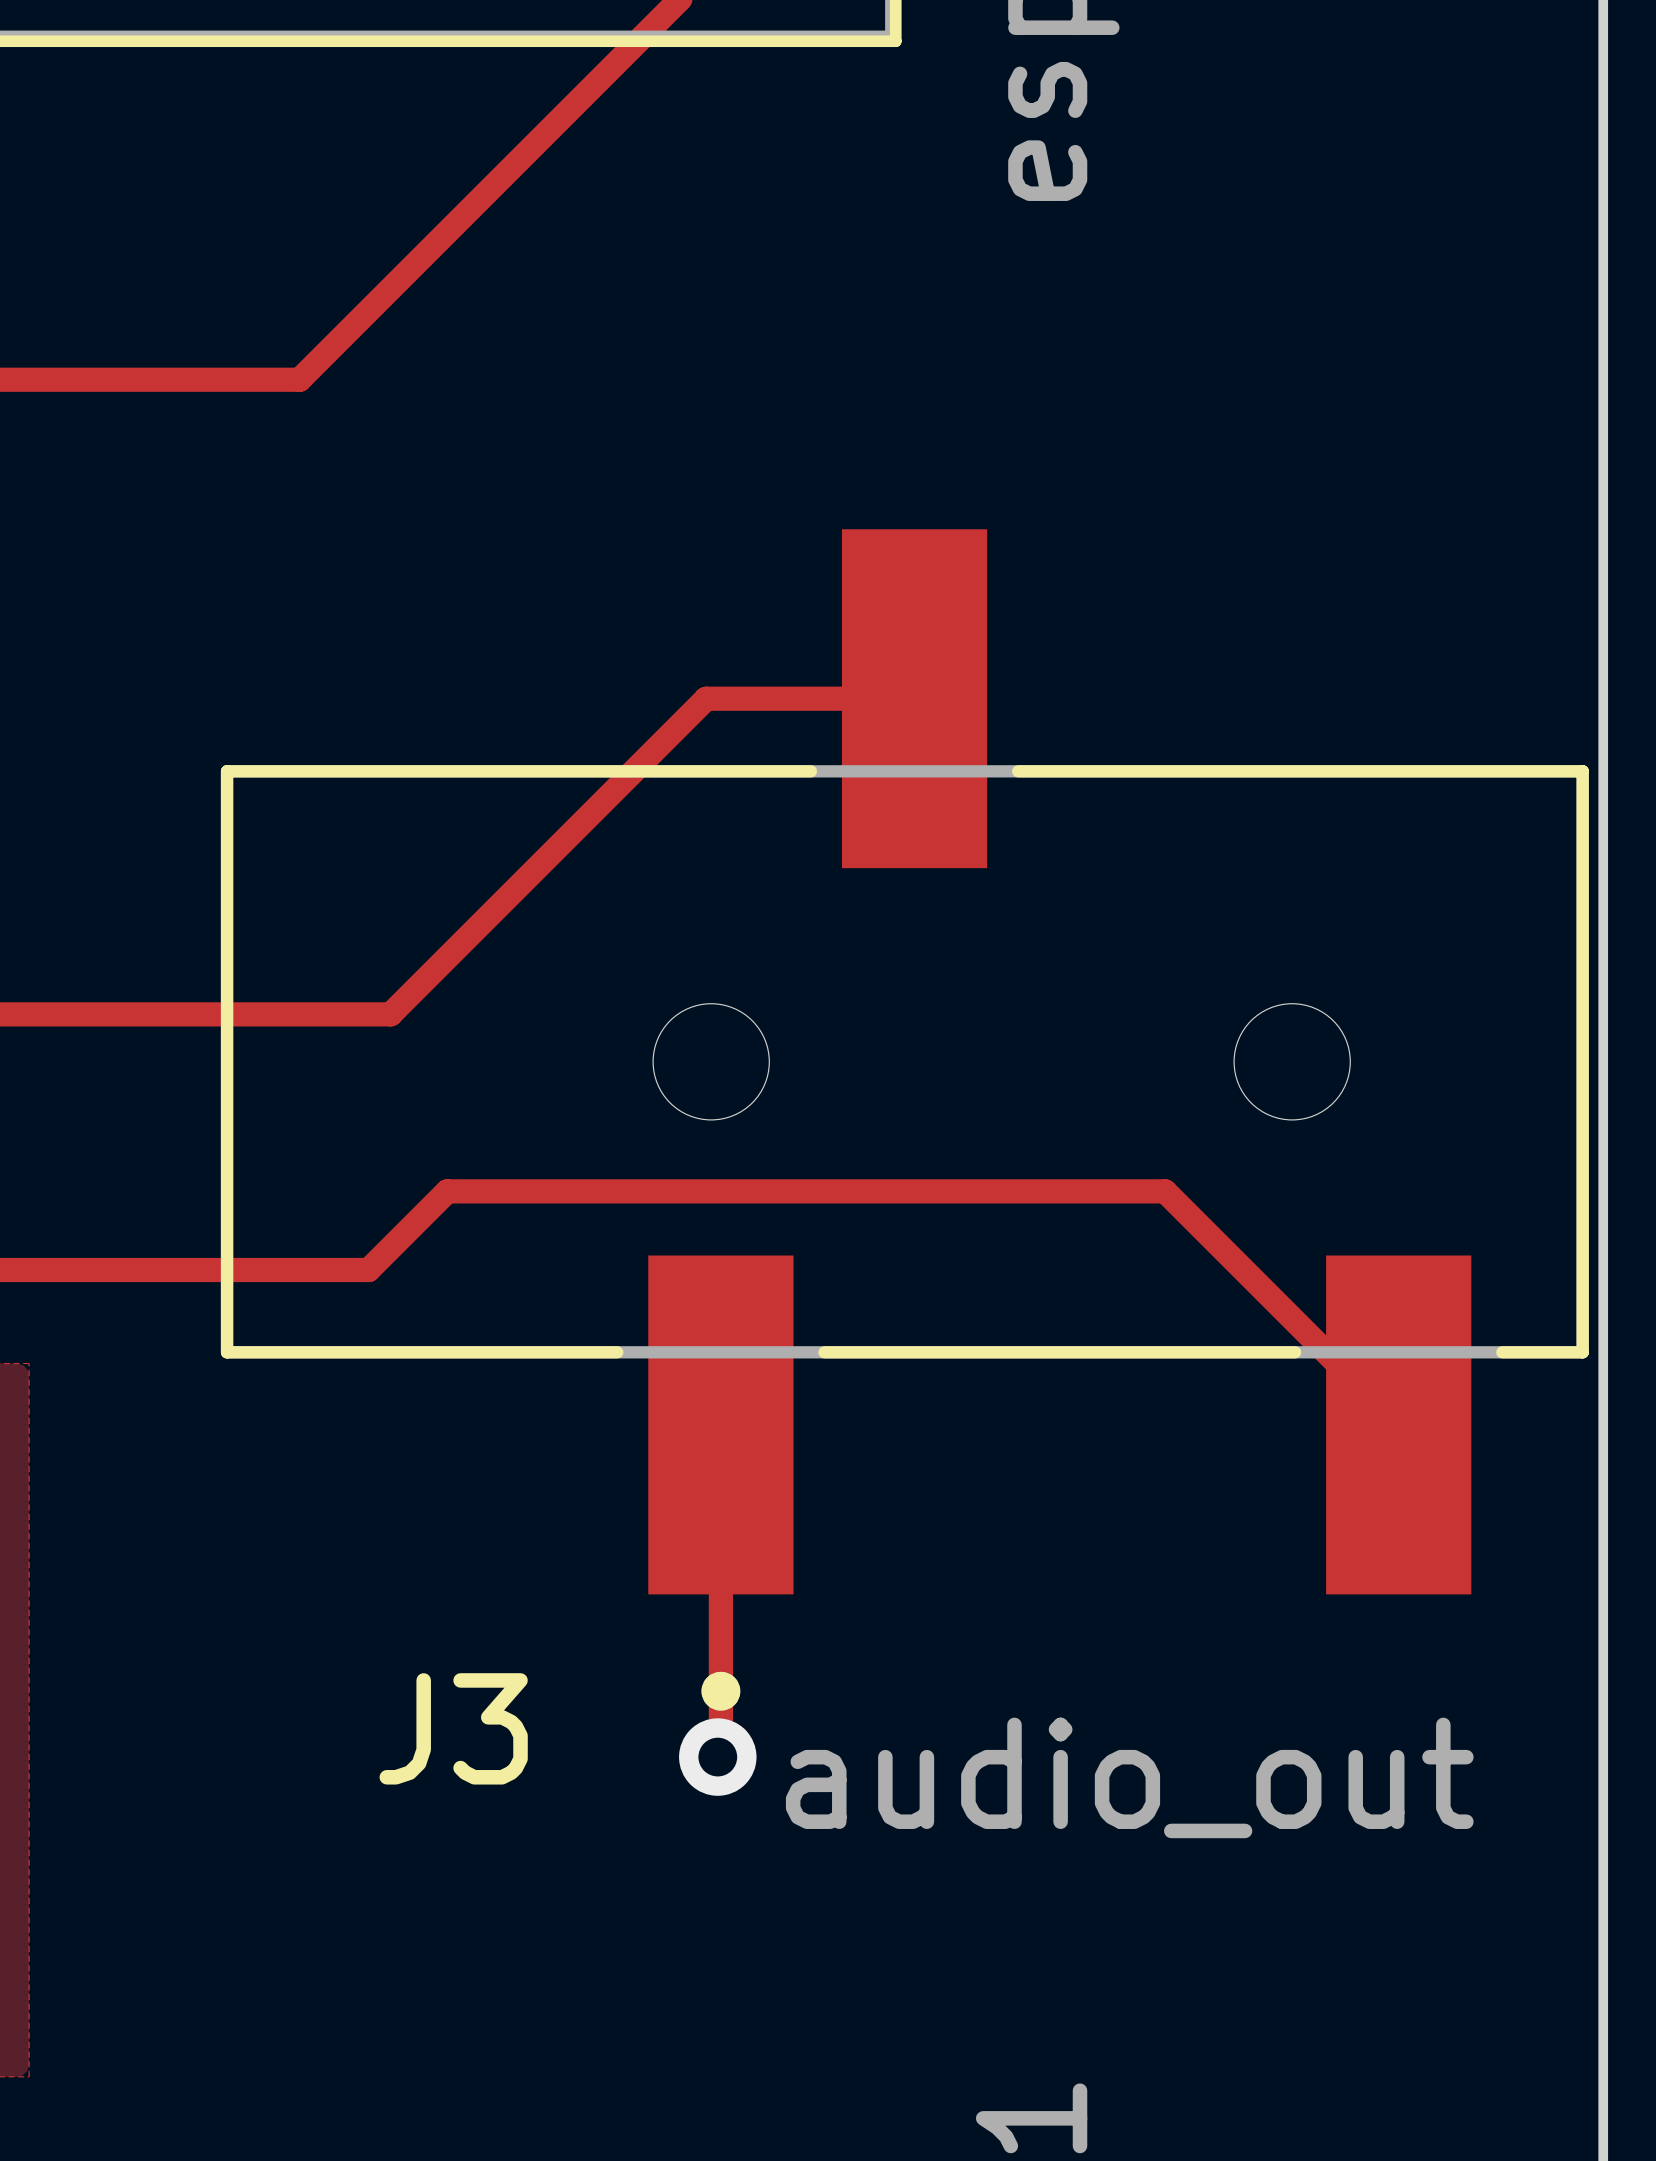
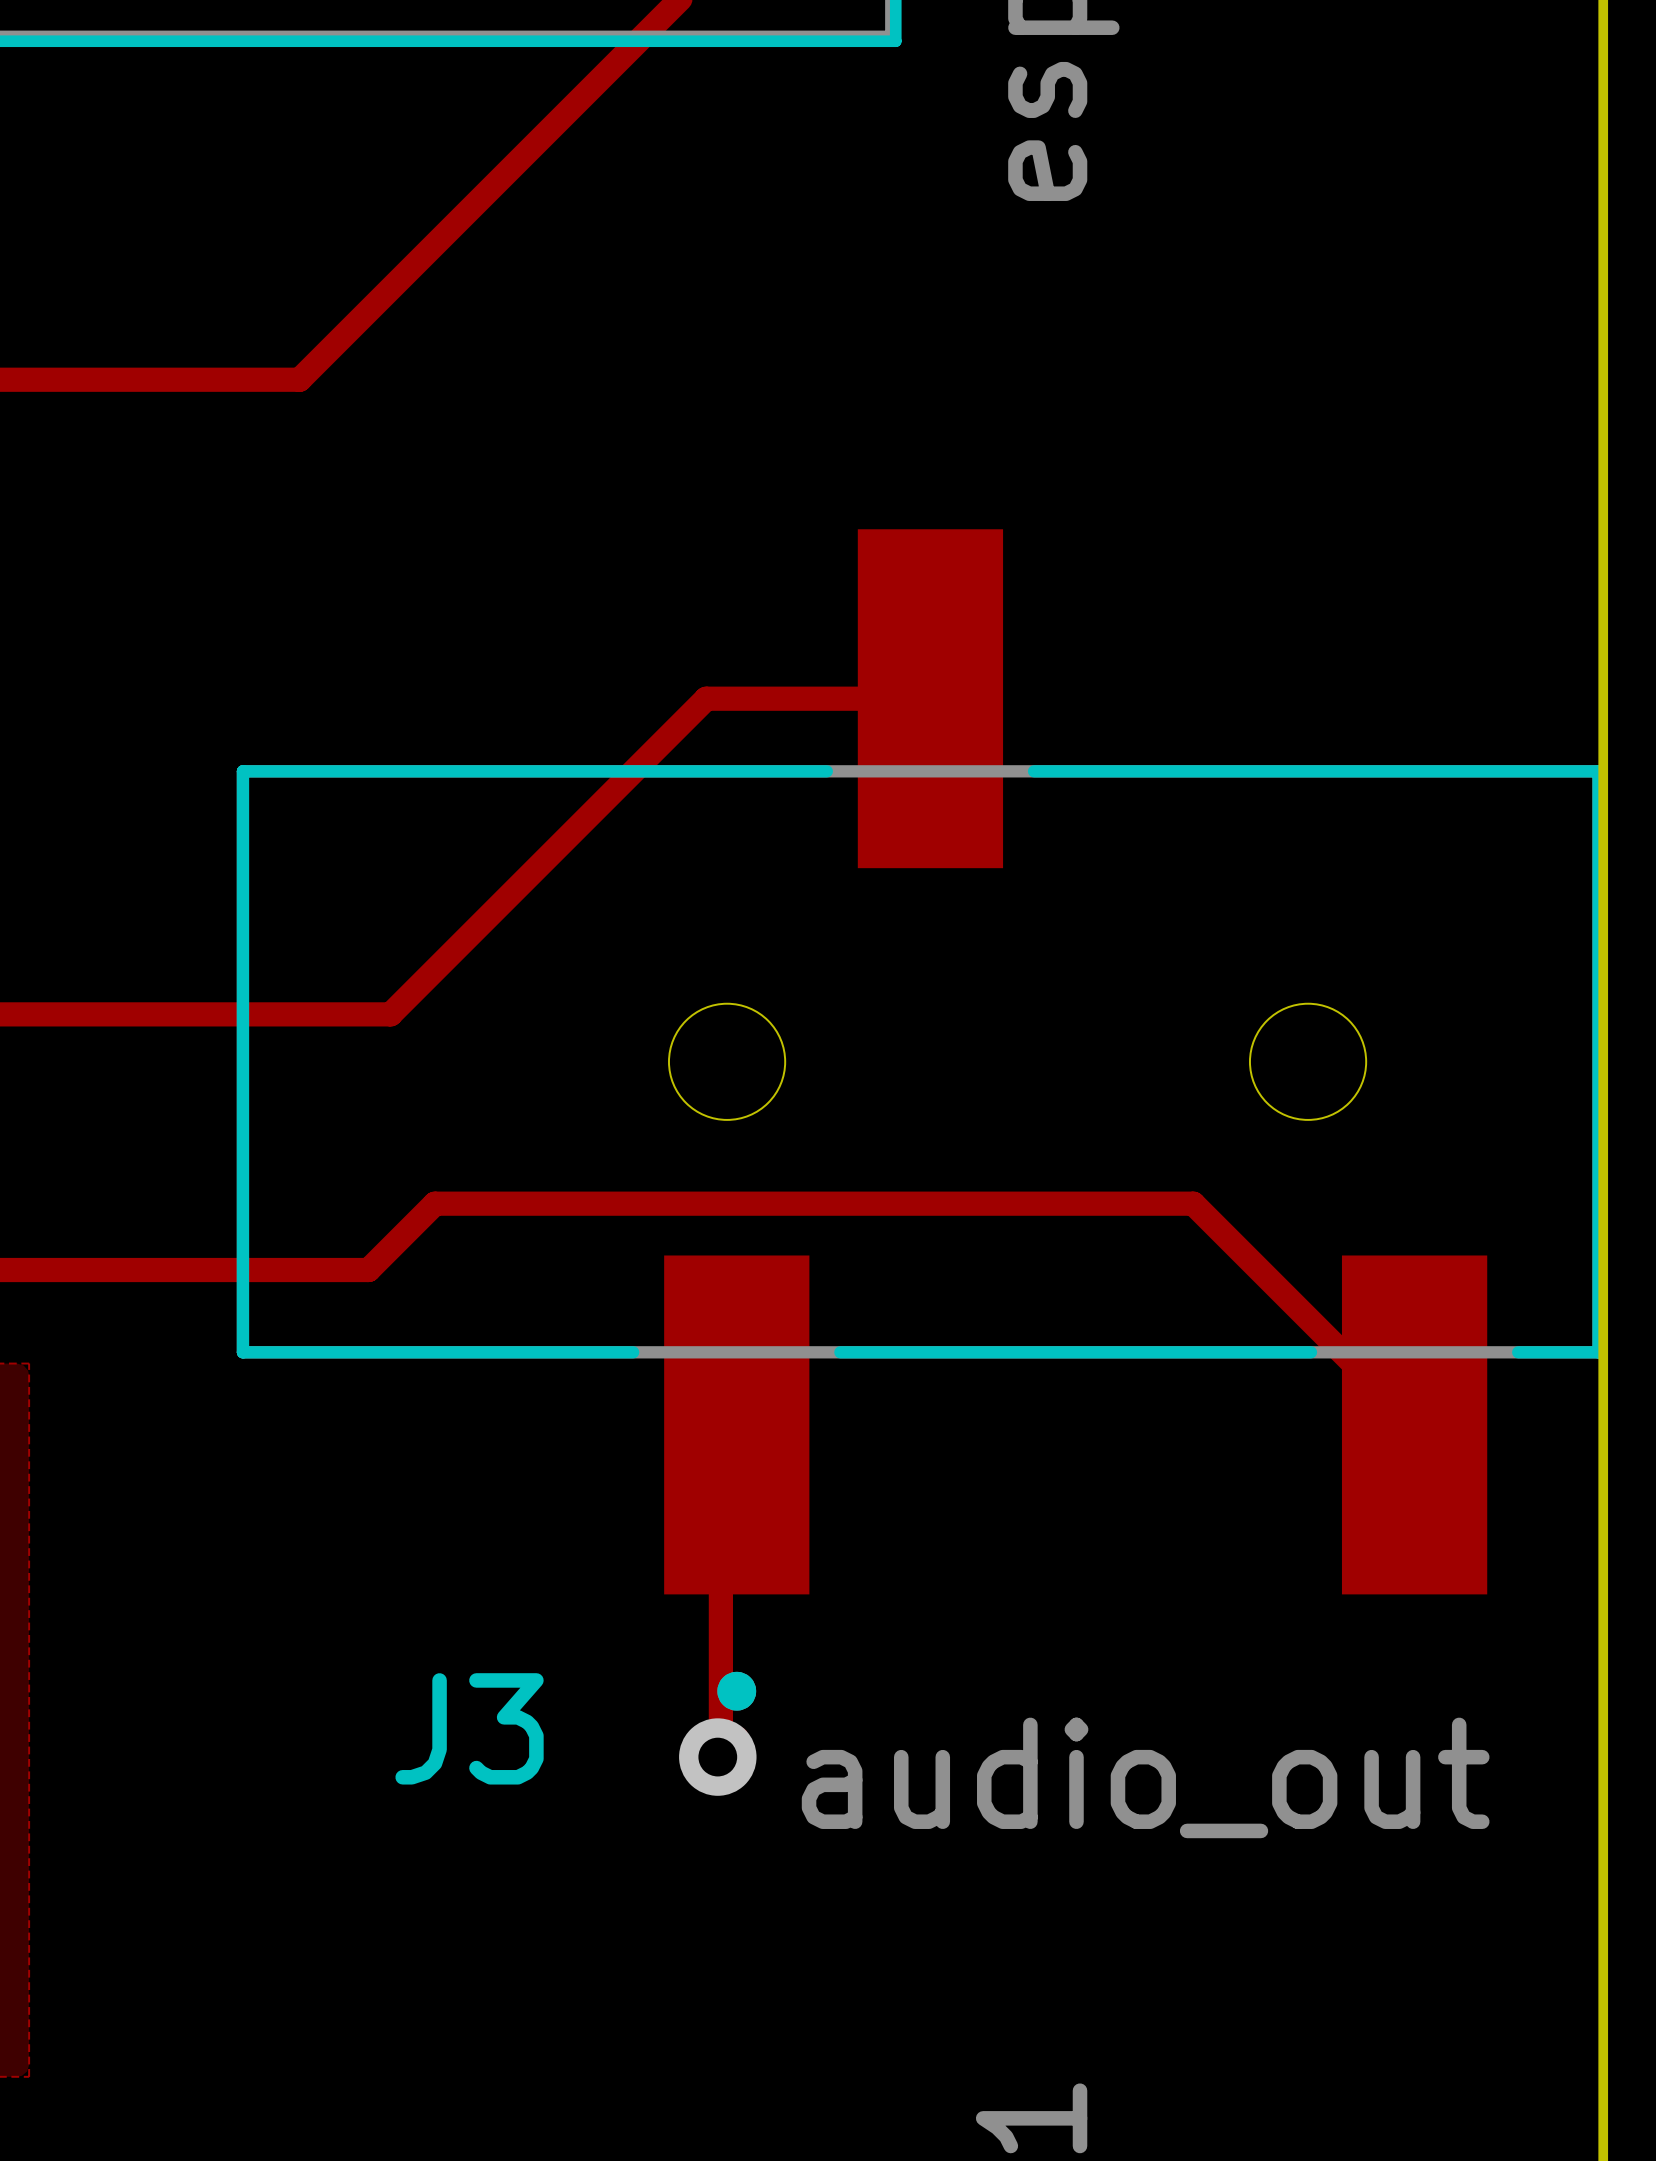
J3 position: (904, 1119) -> (920, 1119)
track: (434, 1203) (447, 1191) (1165, 1191) (1398, 1424) -> (434, 1203) (1193, 1203) (1414, 1424)

